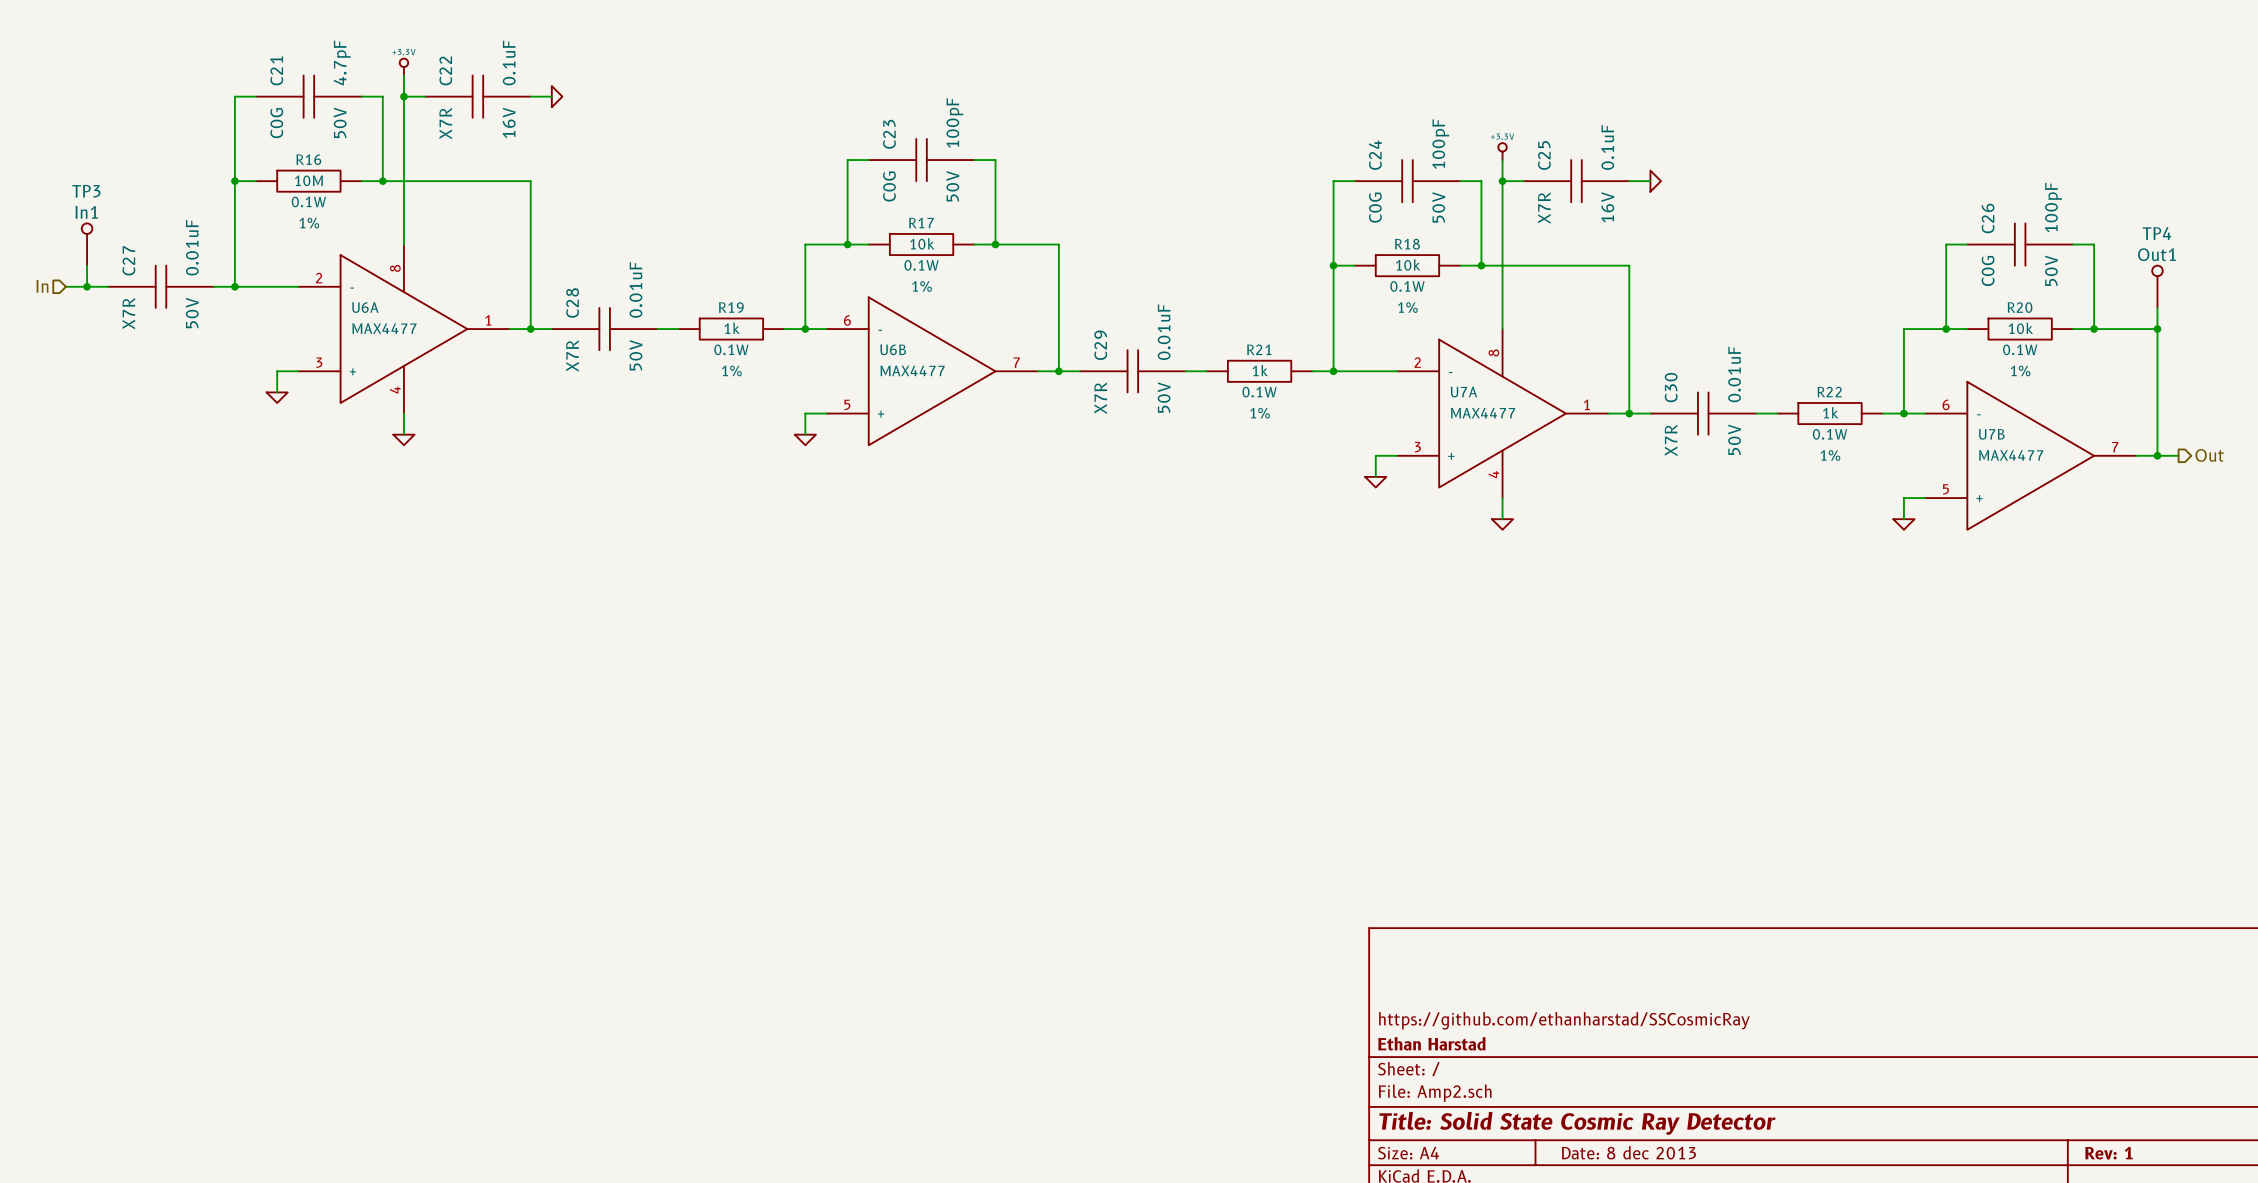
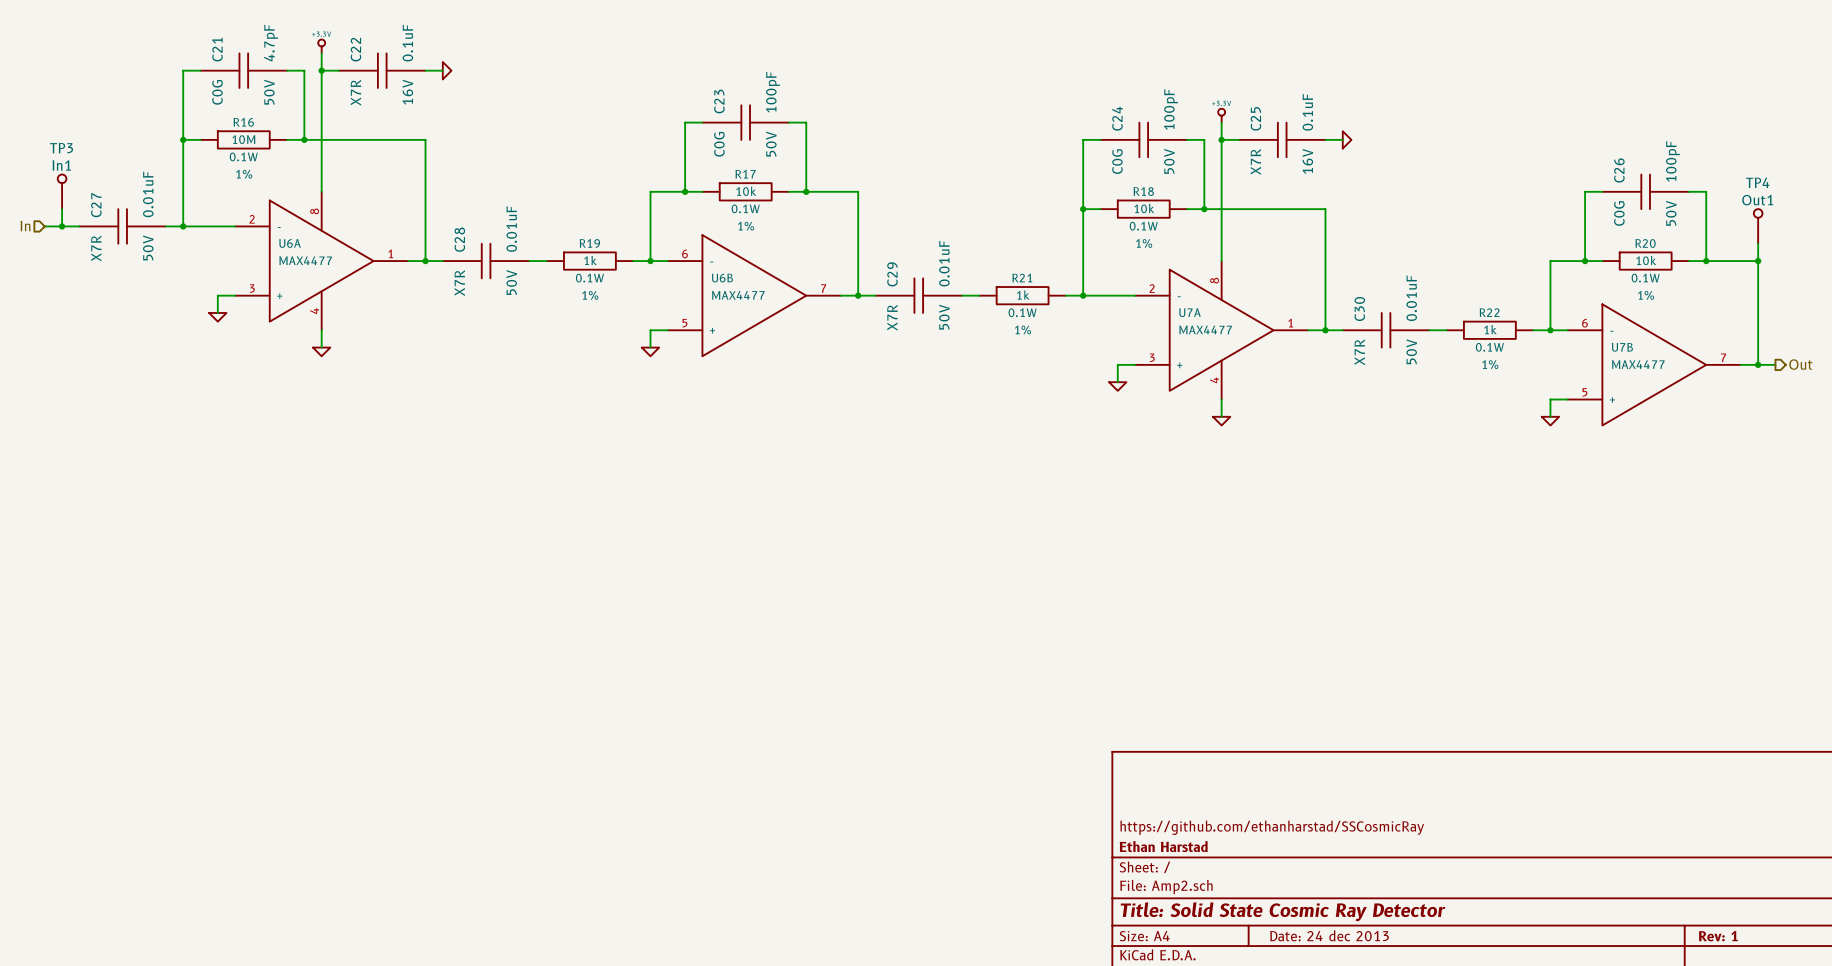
title block: Date: 8 dec 2013 (1628, 1152) -> Date: 24 dec 2013 (1329, 935)

